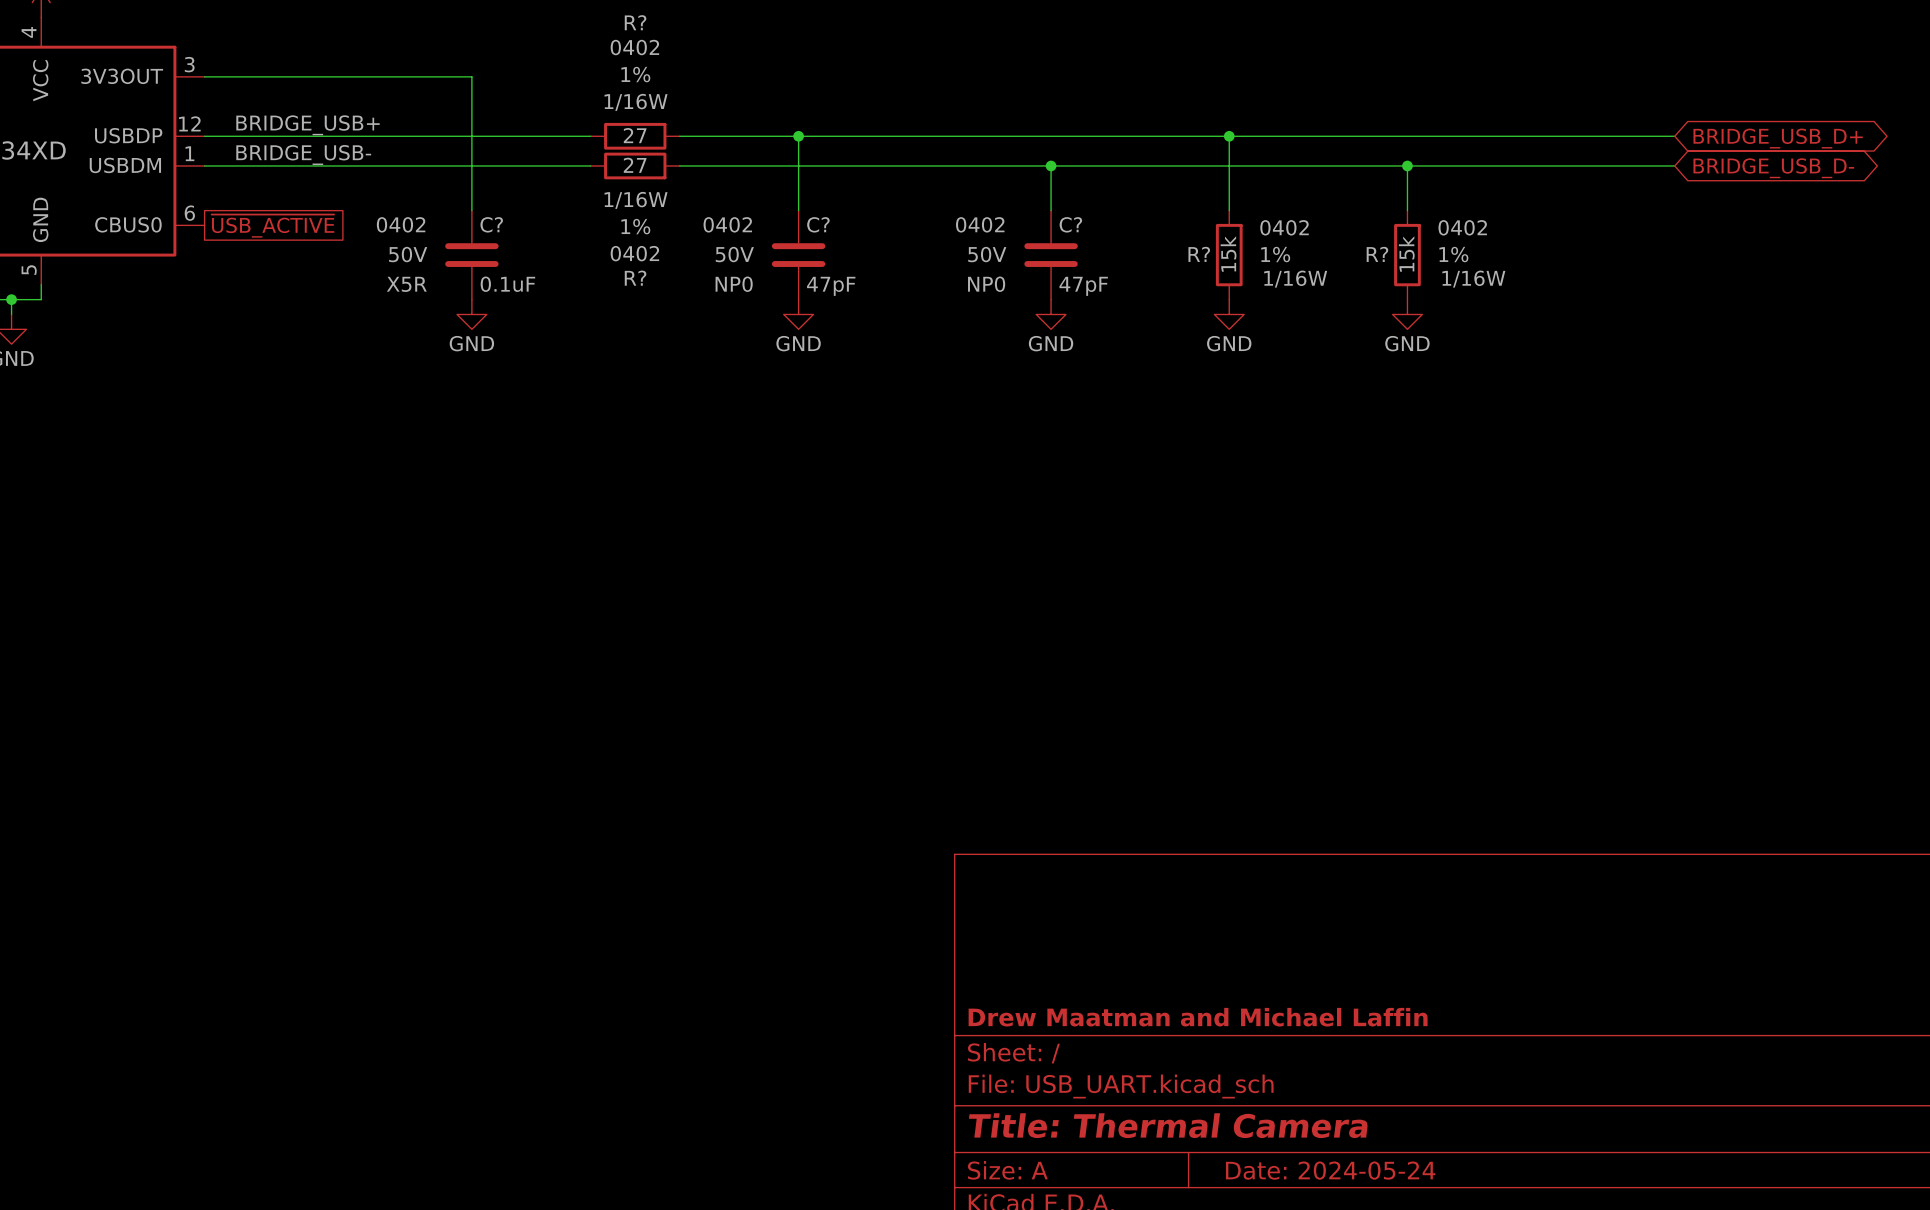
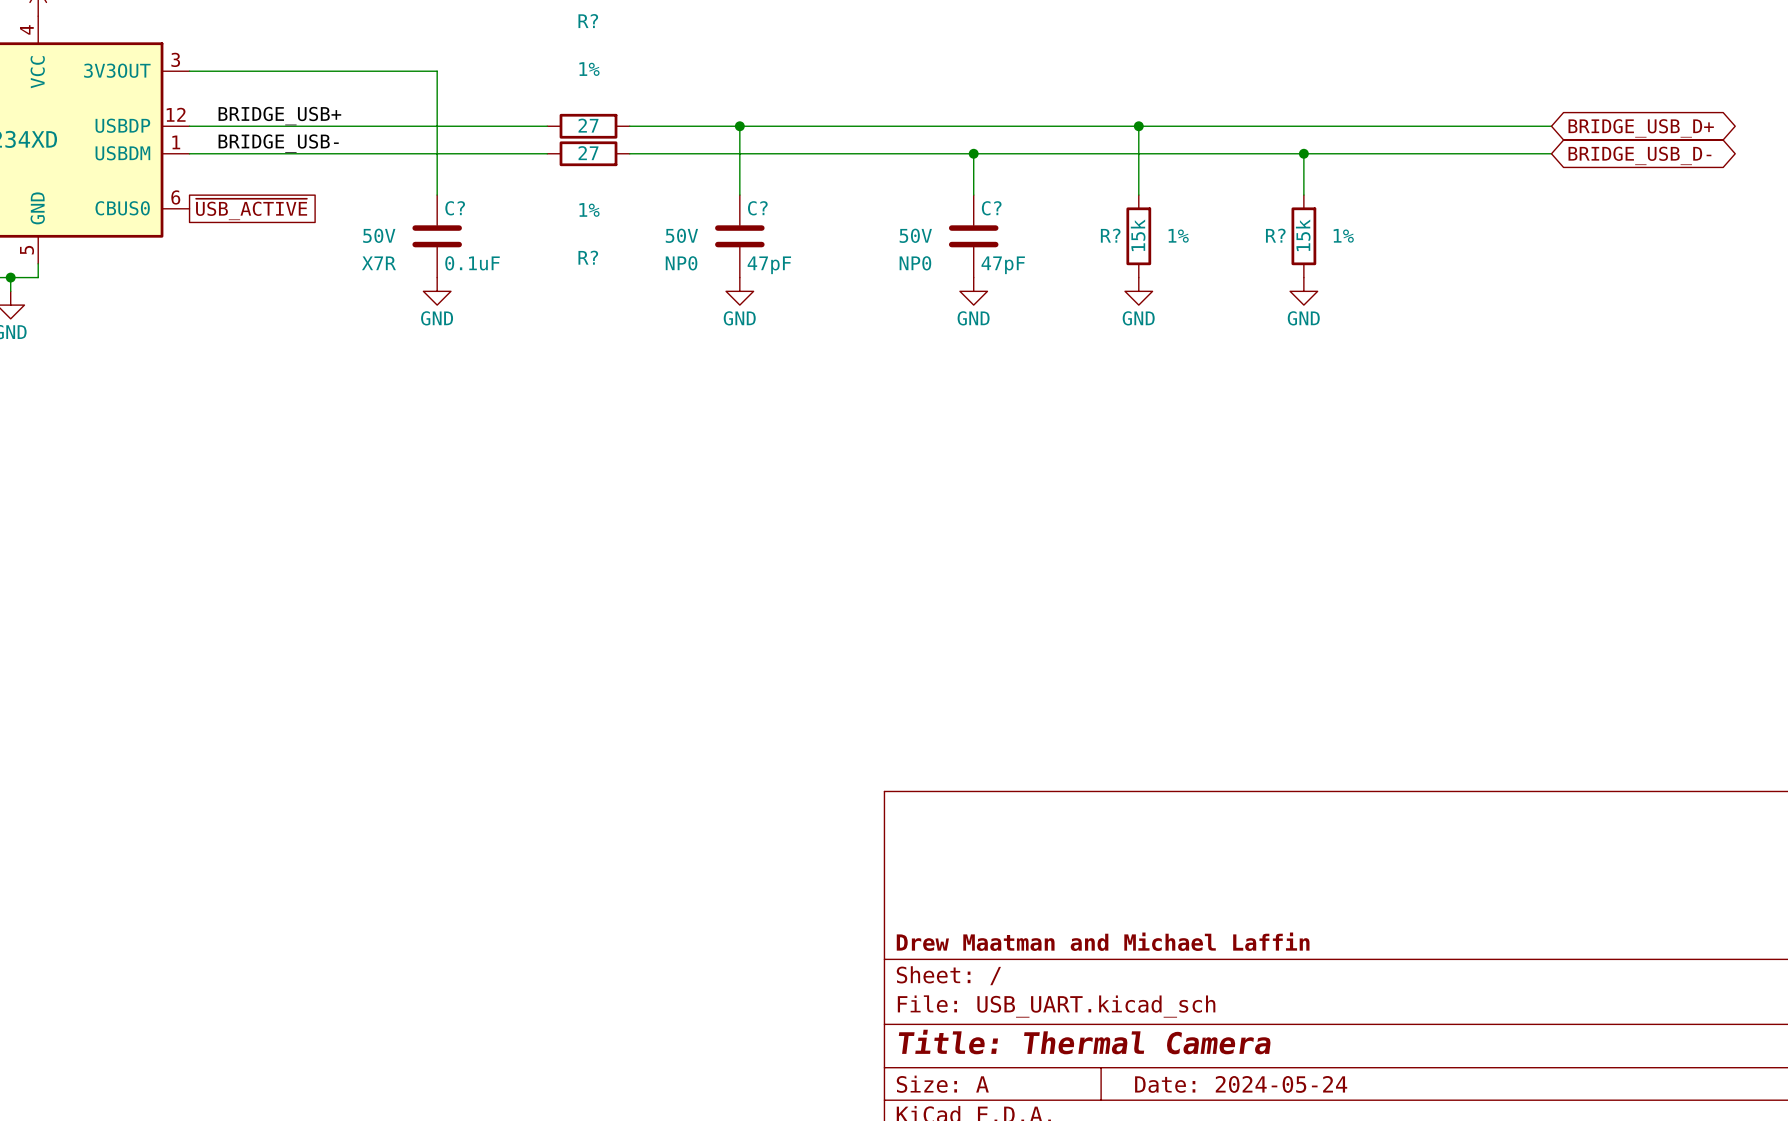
R? text: 0402 (634, 47) -> none
R? text: 1/16W (636, 102) -> none
R? text: 1/16W (636, 200) -> none
C? text: 0402 (401, 224) -> none
C? text: 0402 (727, 224) -> none
C? text: 0402 (980, 224) -> none
R? text: 0402 (1284, 227) -> none
R? text: 0402 (1462, 227) -> none
R? text: 0402 (634, 253) -> none
R? text: 1/16W (1295, 279) -> none
R? text: 1/16W (1473, 279) -> none
C? text: X5R (406, 284) -> X7R (378, 263)

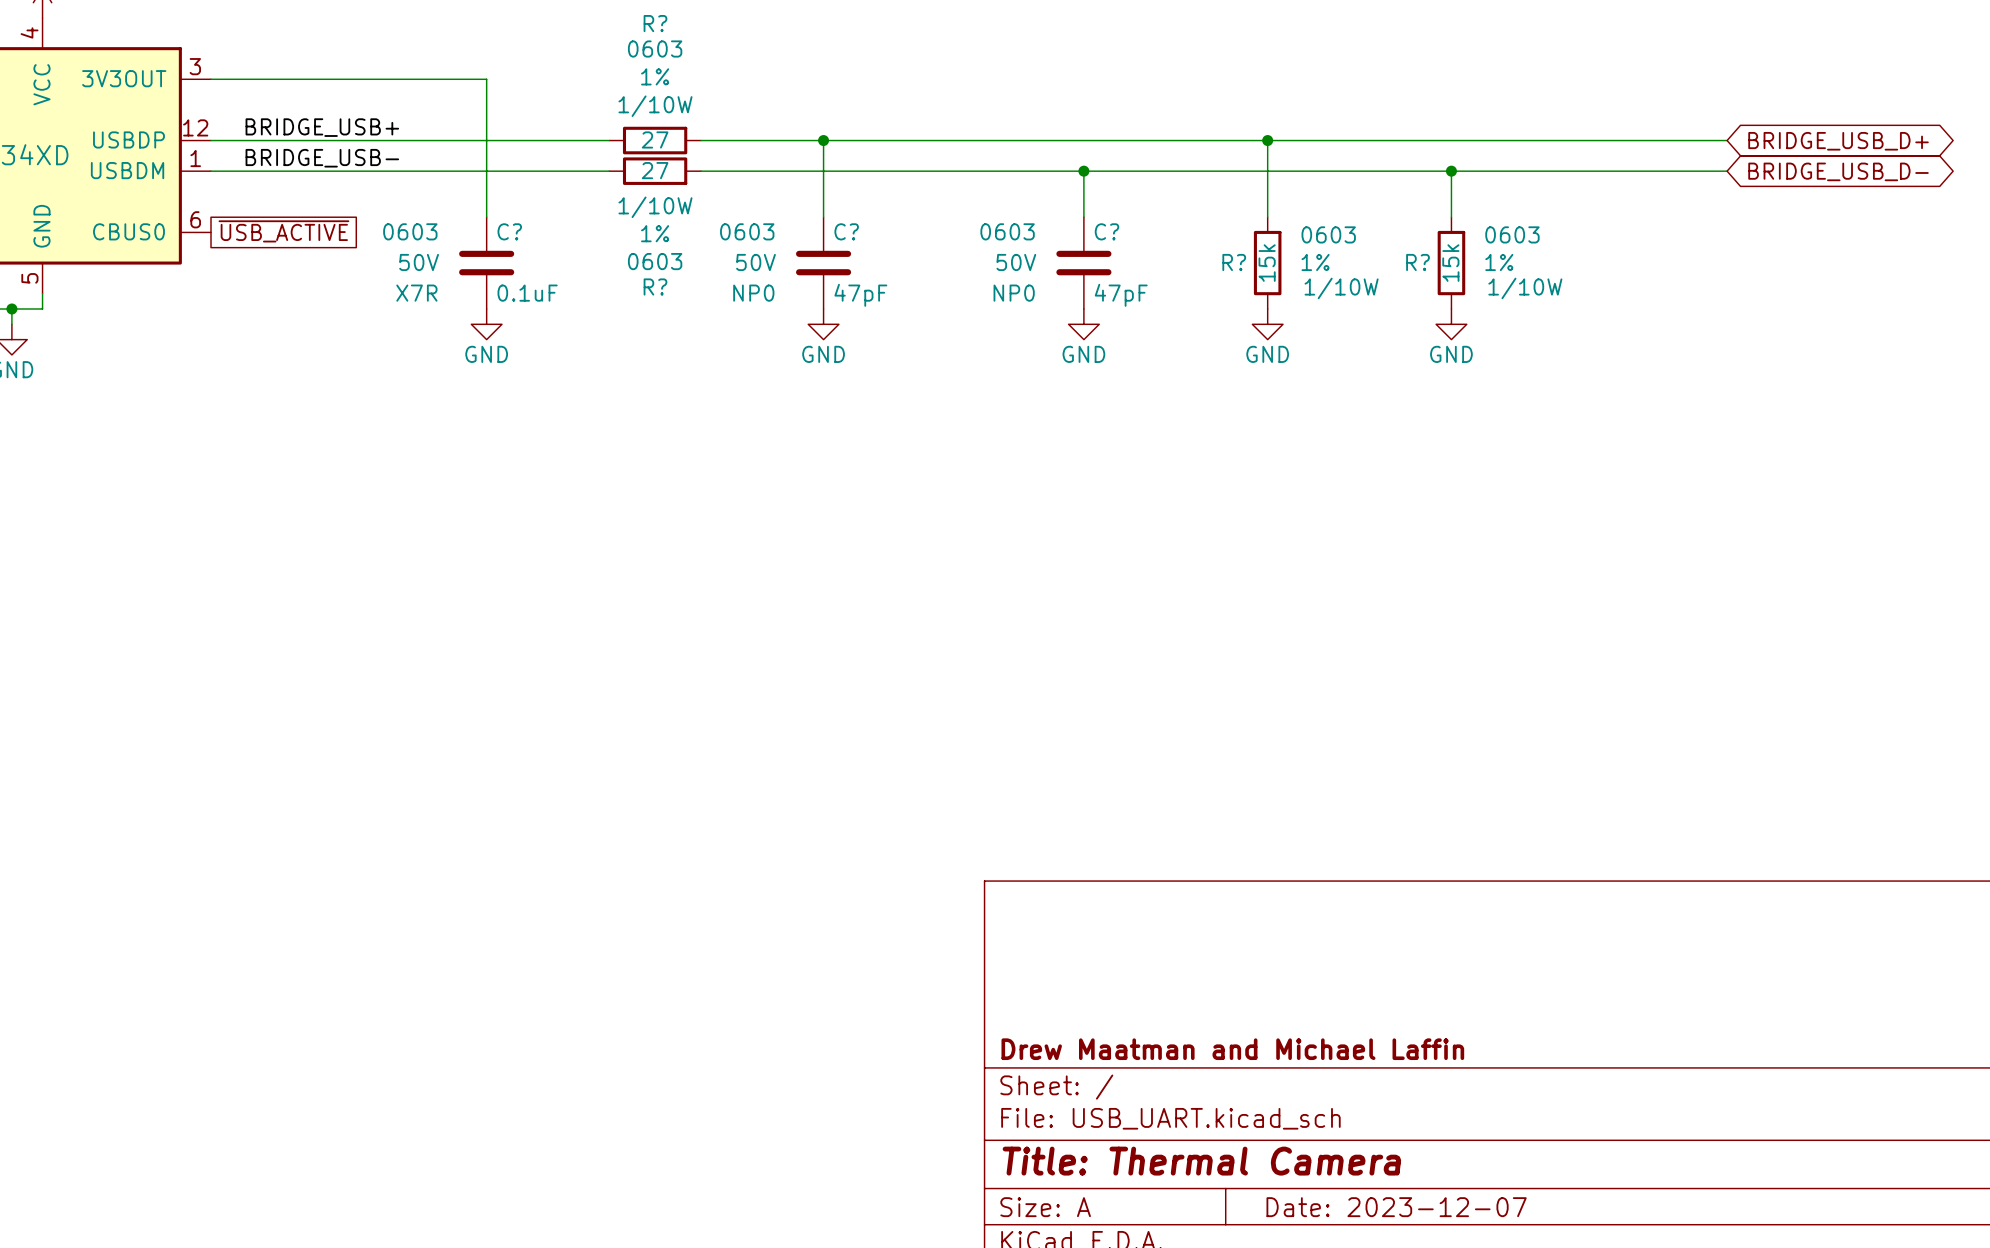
R? text: none -> 0603 (655, 49)
R? text: none -> 1/10W (655, 106)
R? text: none -> 1/10W (655, 207)
C? text: none -> 0603 (410, 231)
C? text: none -> 0603 (747, 231)
C? text: none -> 0603 (1007, 231)
R? text: none -> 0603 (1328, 234)
R? text: none -> 0603 (1512, 234)
R? text: none -> 0603 (655, 261)
R? text: none -> 1/10W (1341, 288)
R? text: none -> 1/10W (1525, 288)
title block: Date: 2024-05-24 (1241, 1084) -> Date: 2023-12-07 (1396, 1207)

